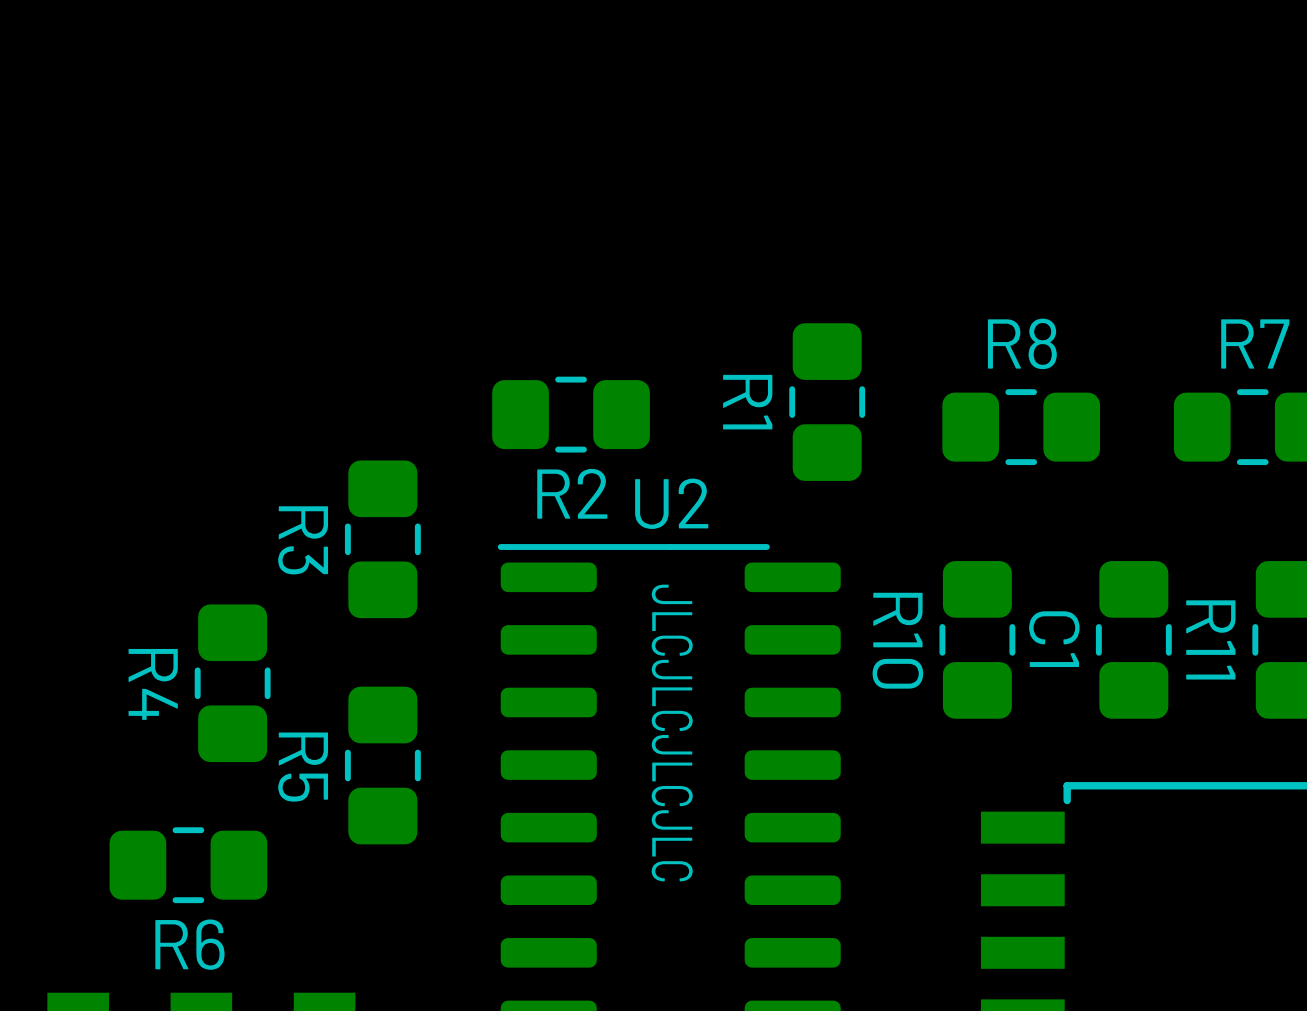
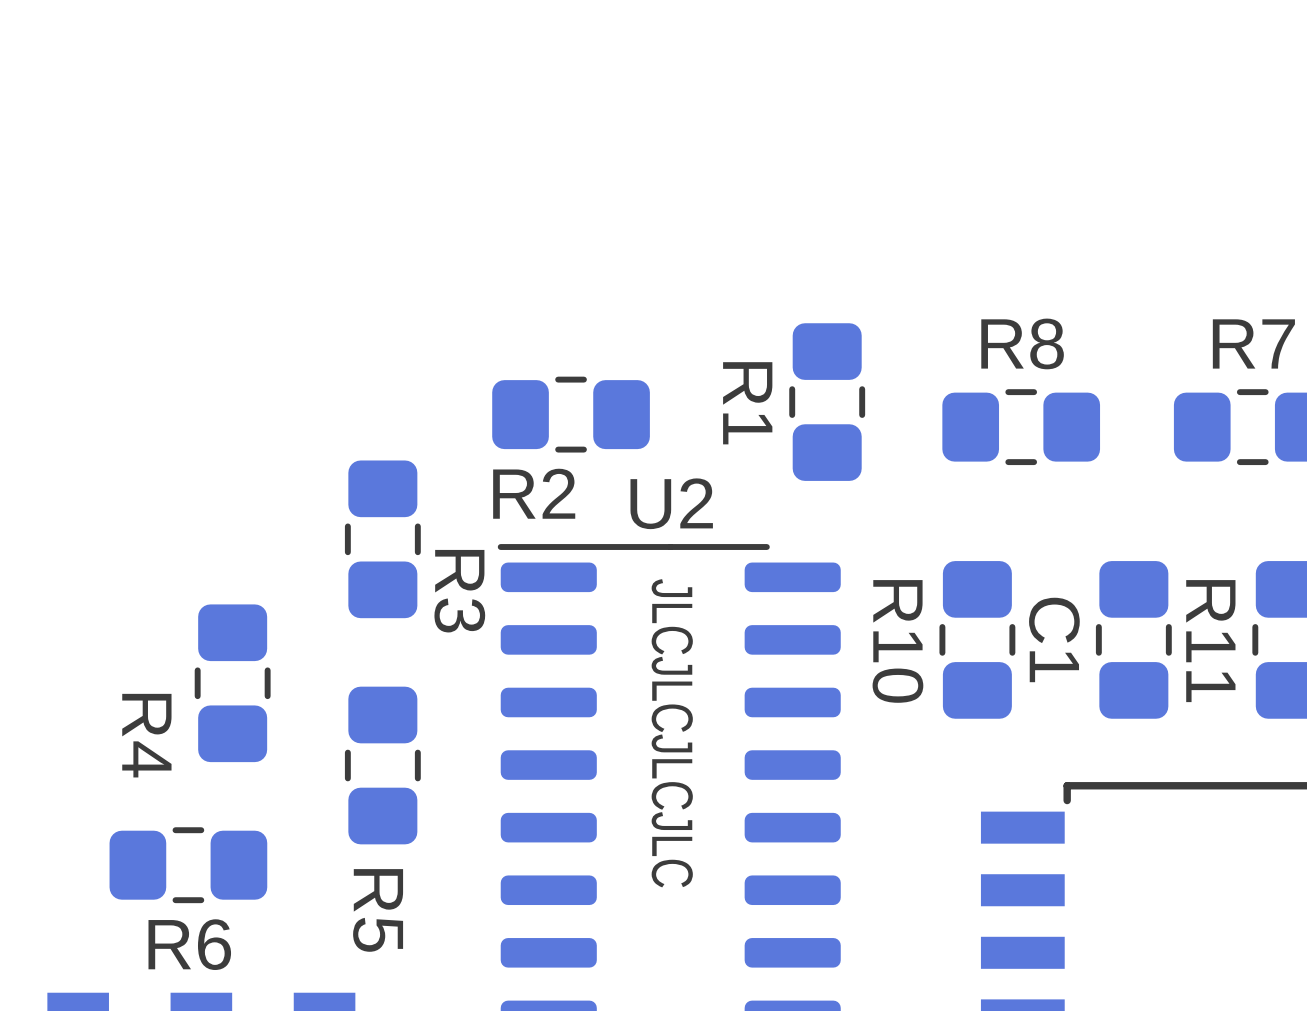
R2 name position: R2 (572, 493) -> R2 (534, 493)
R3 name position: R3 (303, 540) -> R3 (459, 591)
R4 name position: R4 (153, 684) -> R4 (146, 735)
R5 name position: R5 (303, 767) -> R5 (378, 910)

